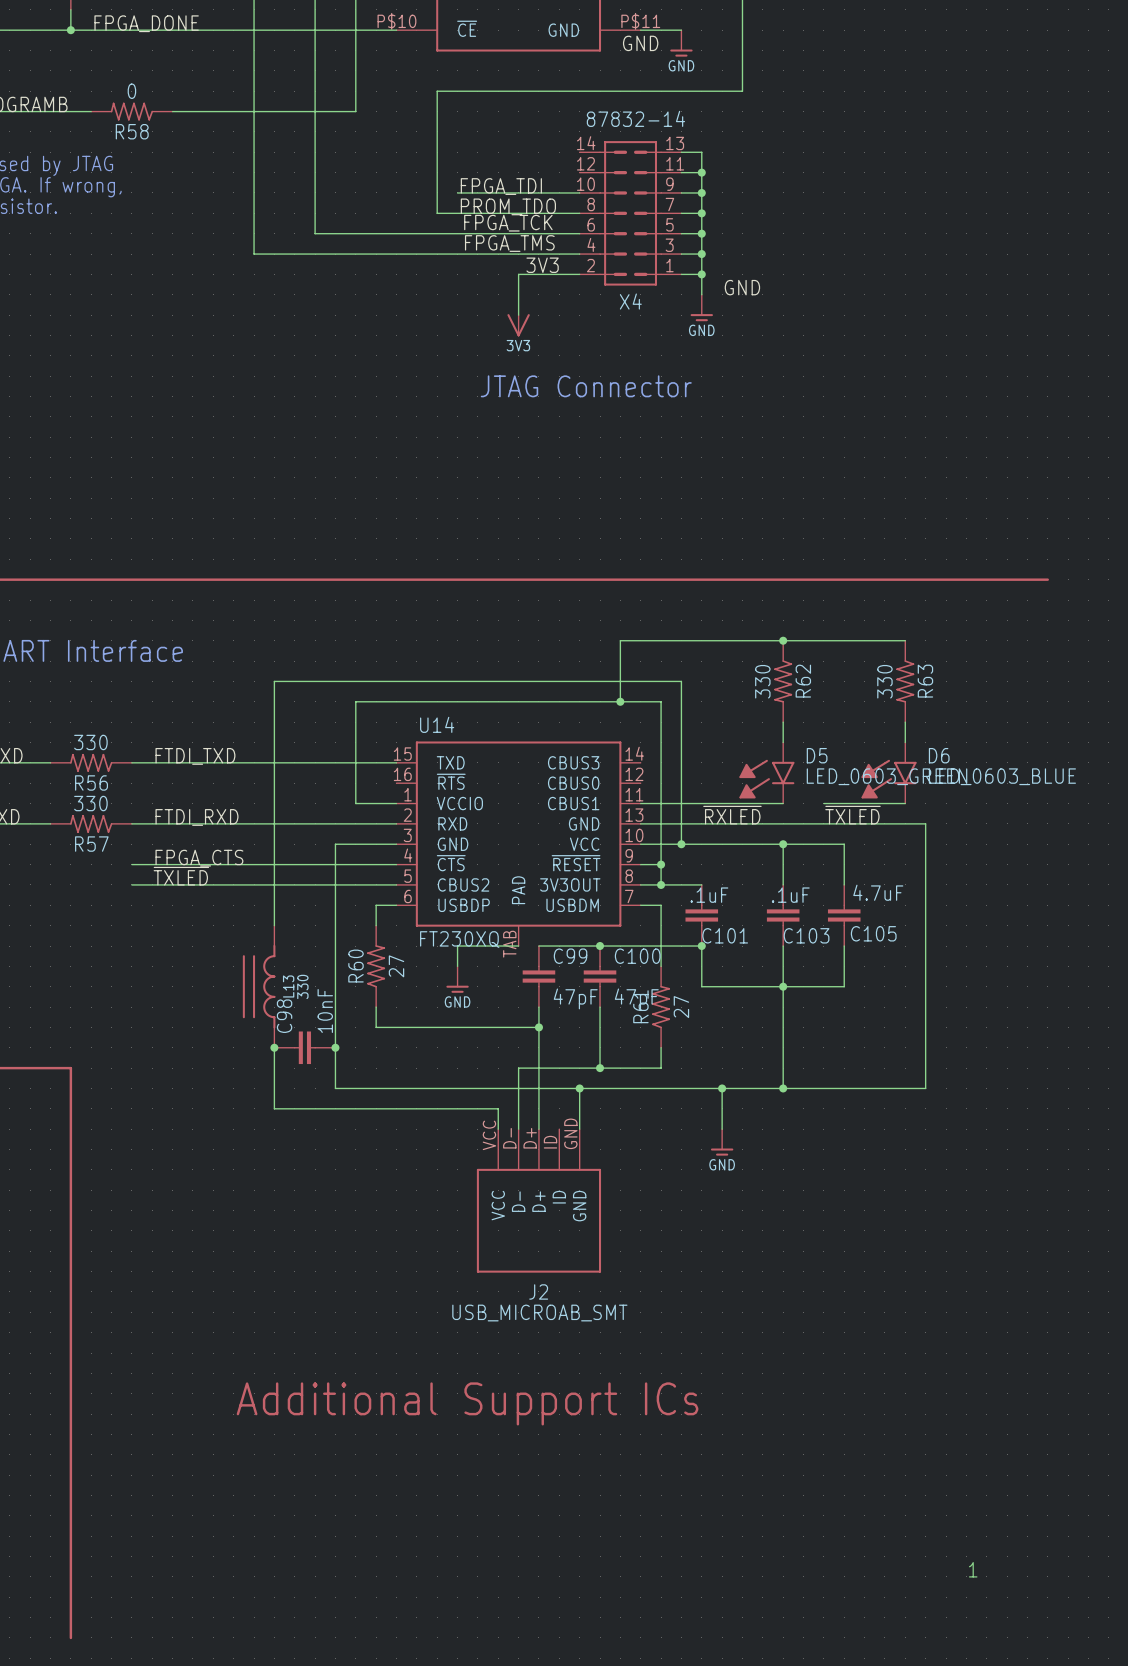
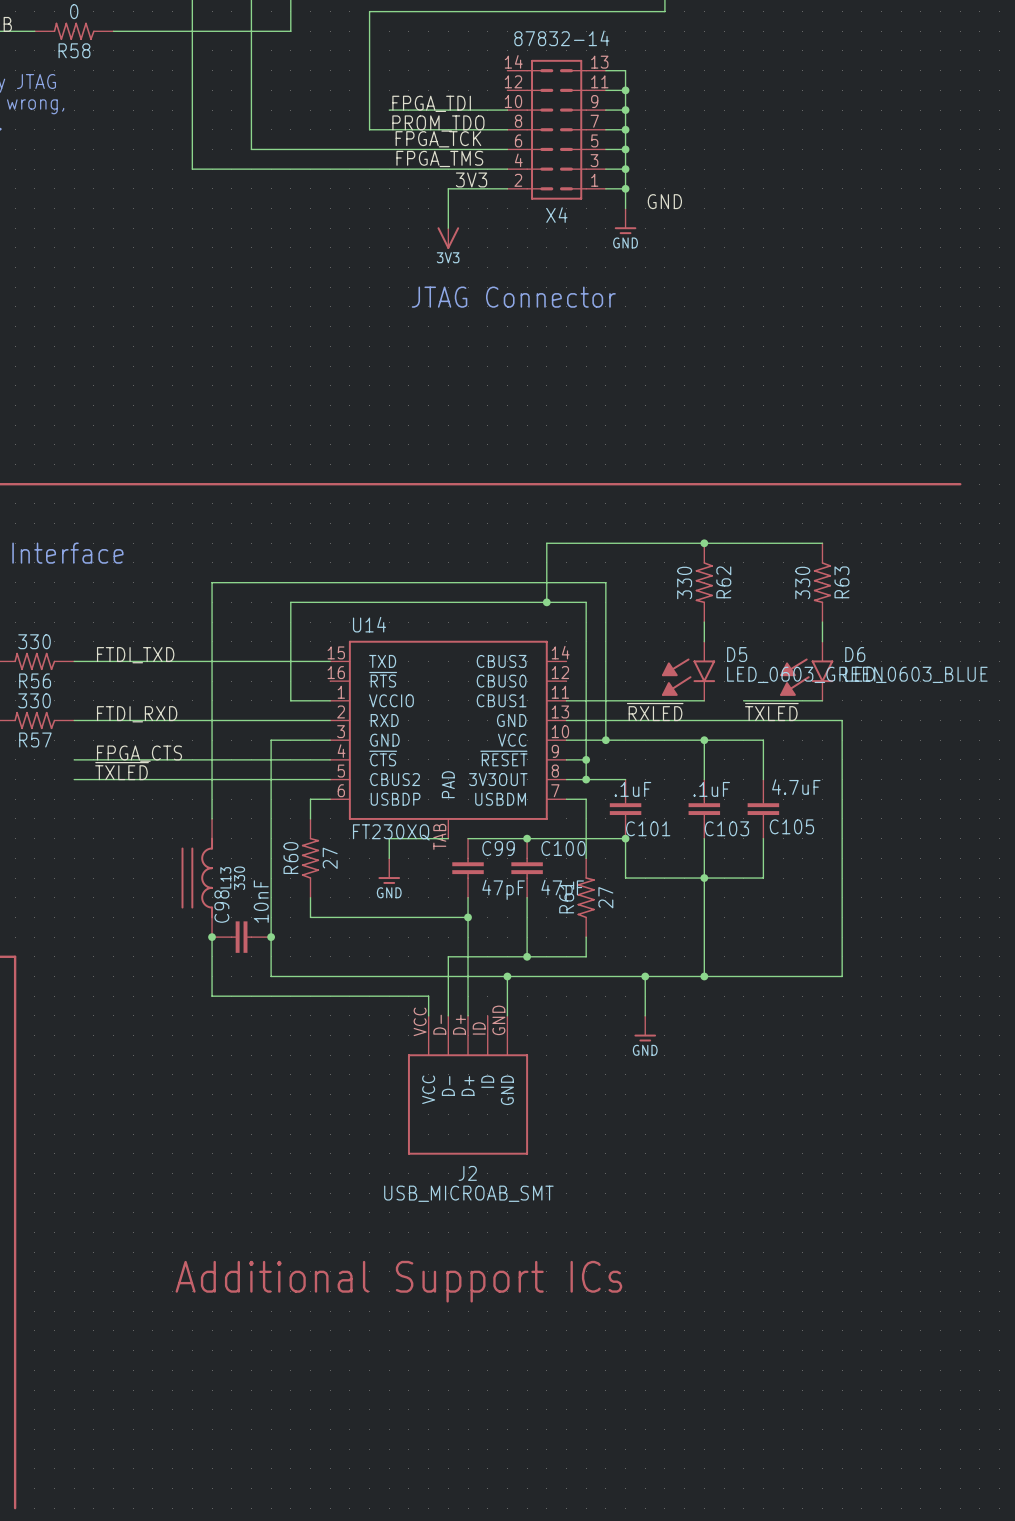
text: 1 (973, 1569) -> none

